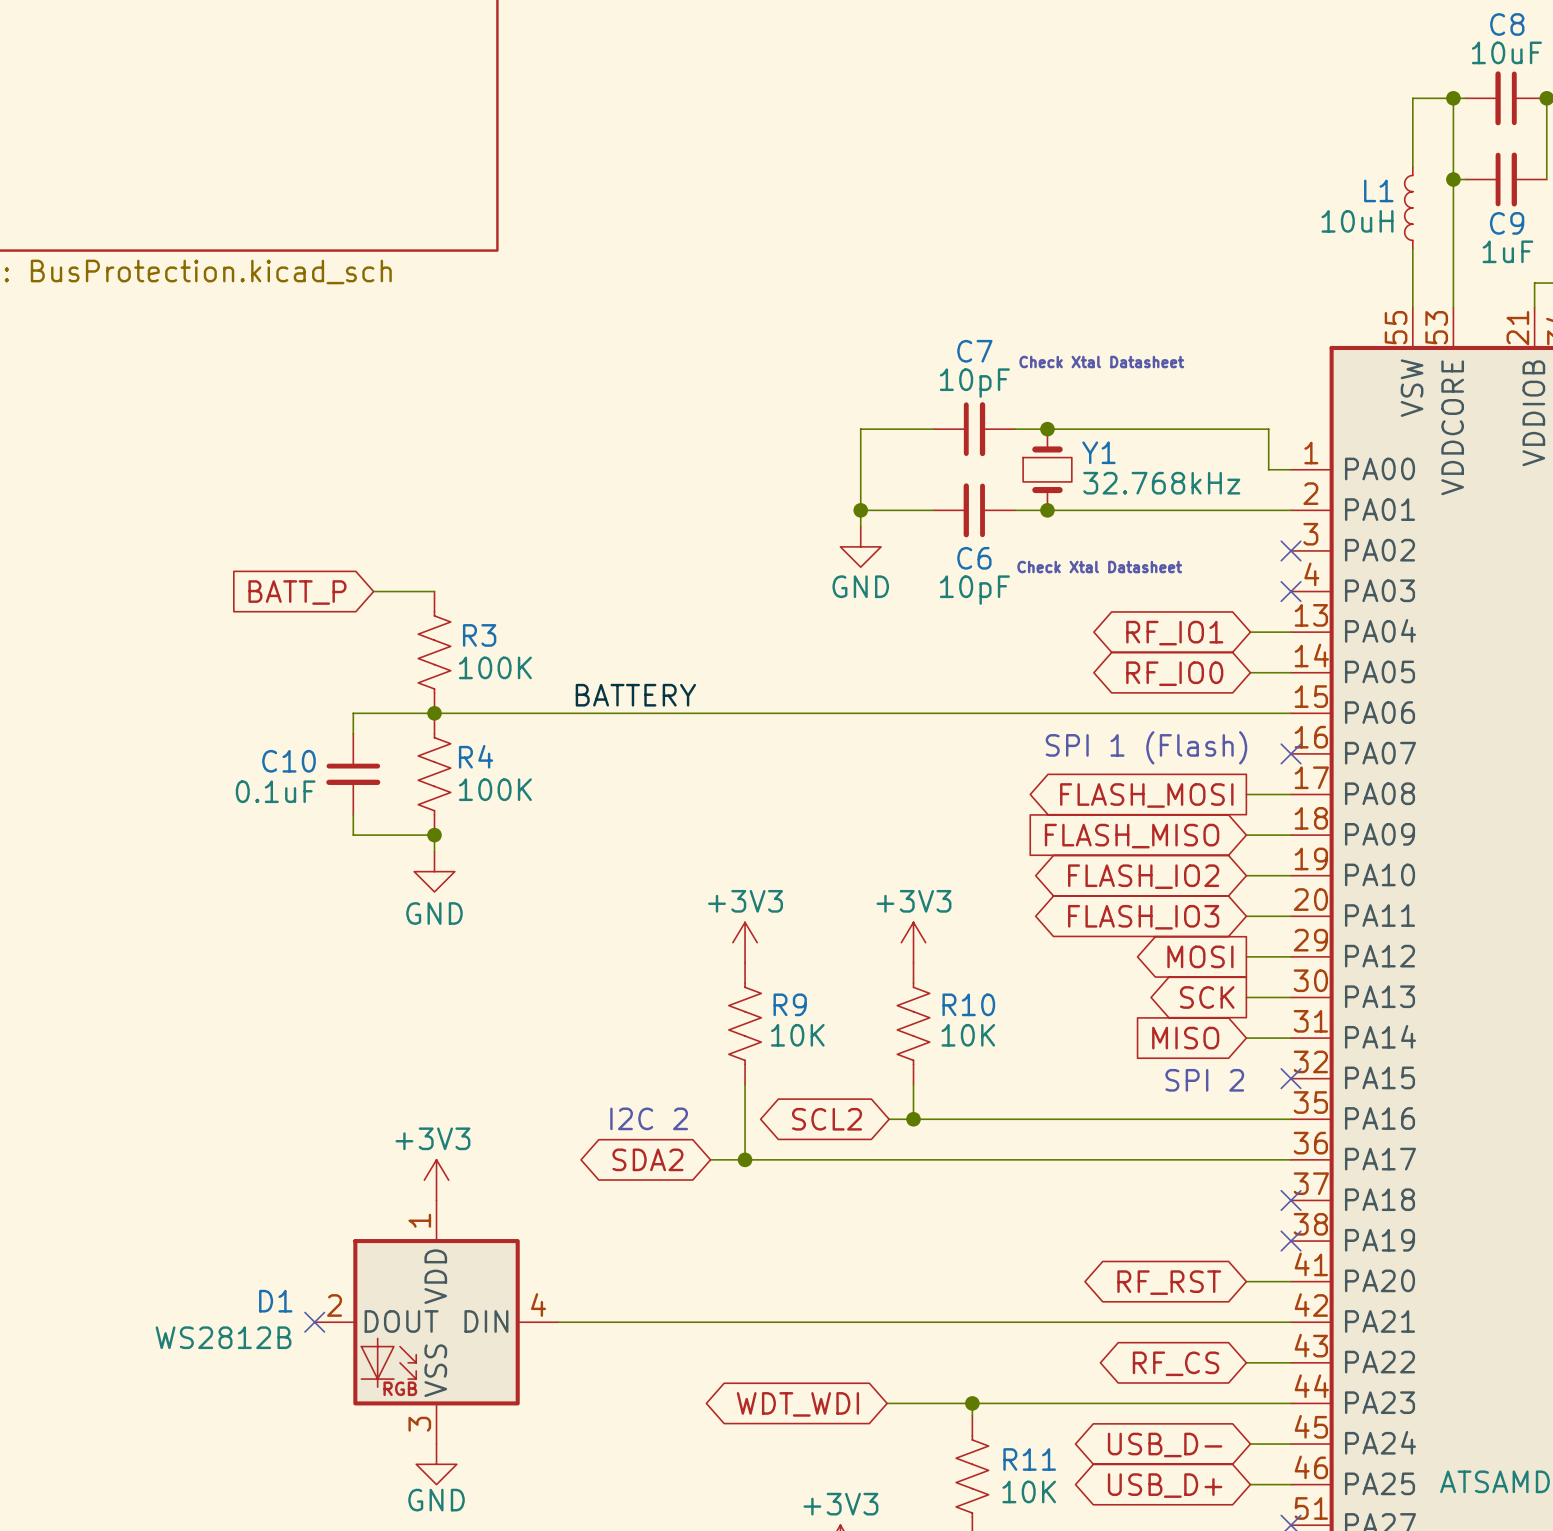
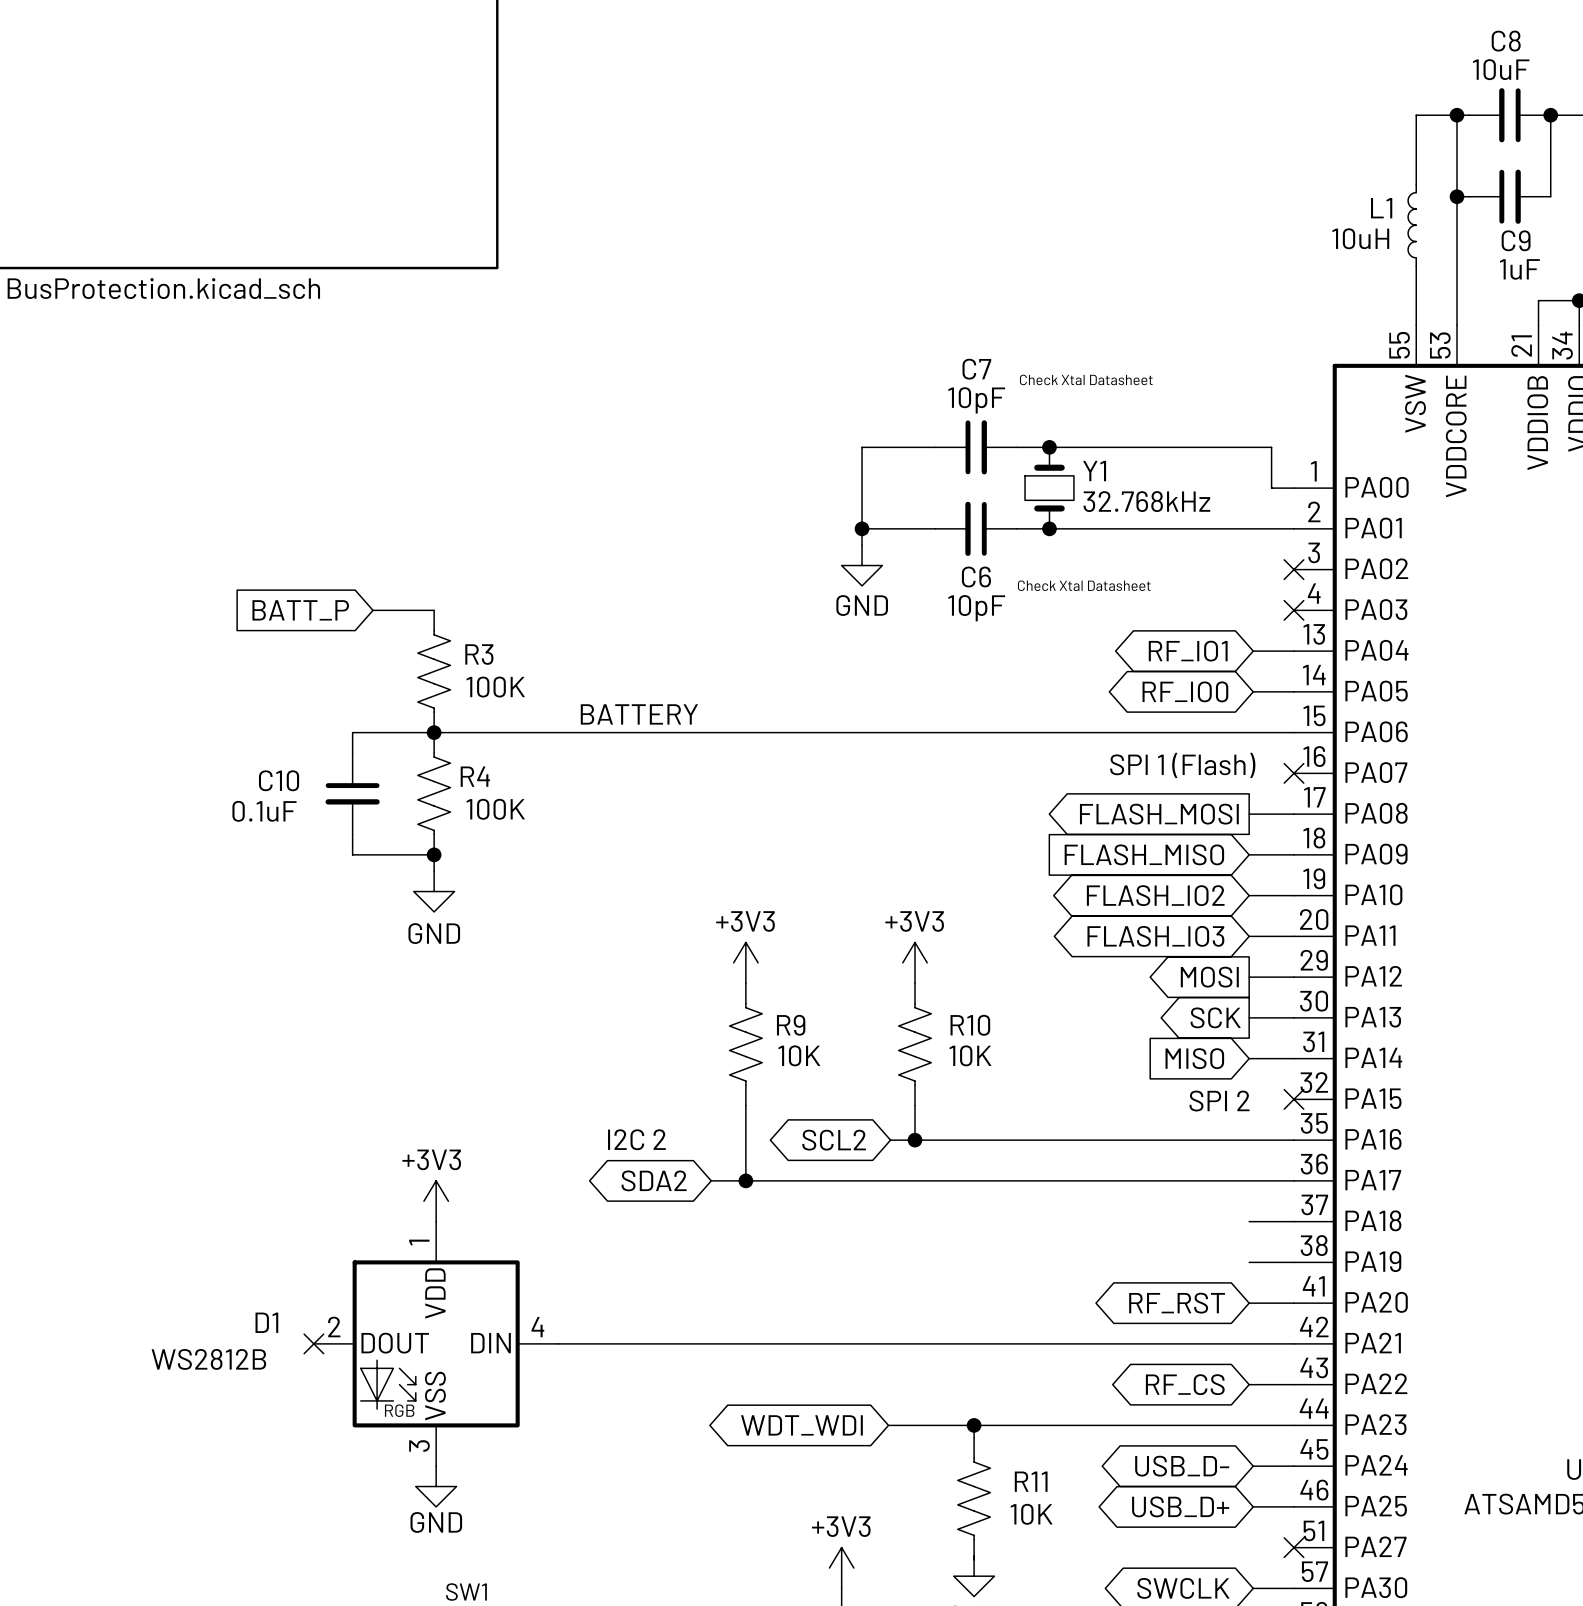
wire: none -> (1249, 1221) (1294, 1221)
no-connect mark: (1291, 1200) -> none
wire: none -> (1249, 1262) (1294, 1262)
no-connect mark: (1291, 1241) -> none

